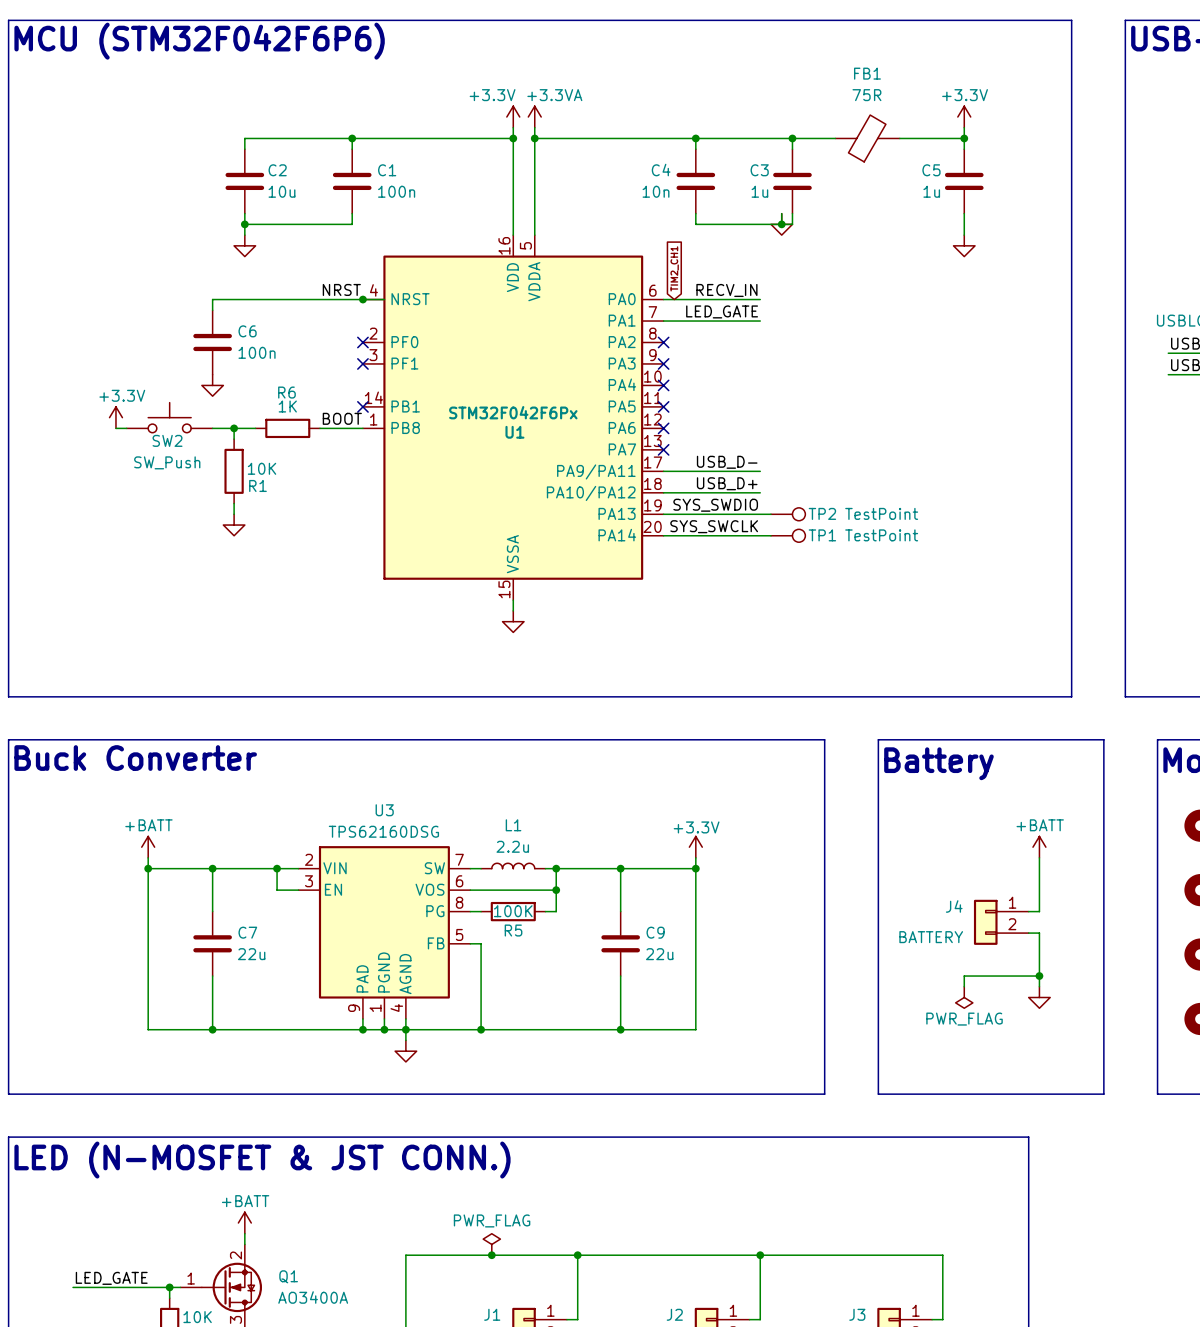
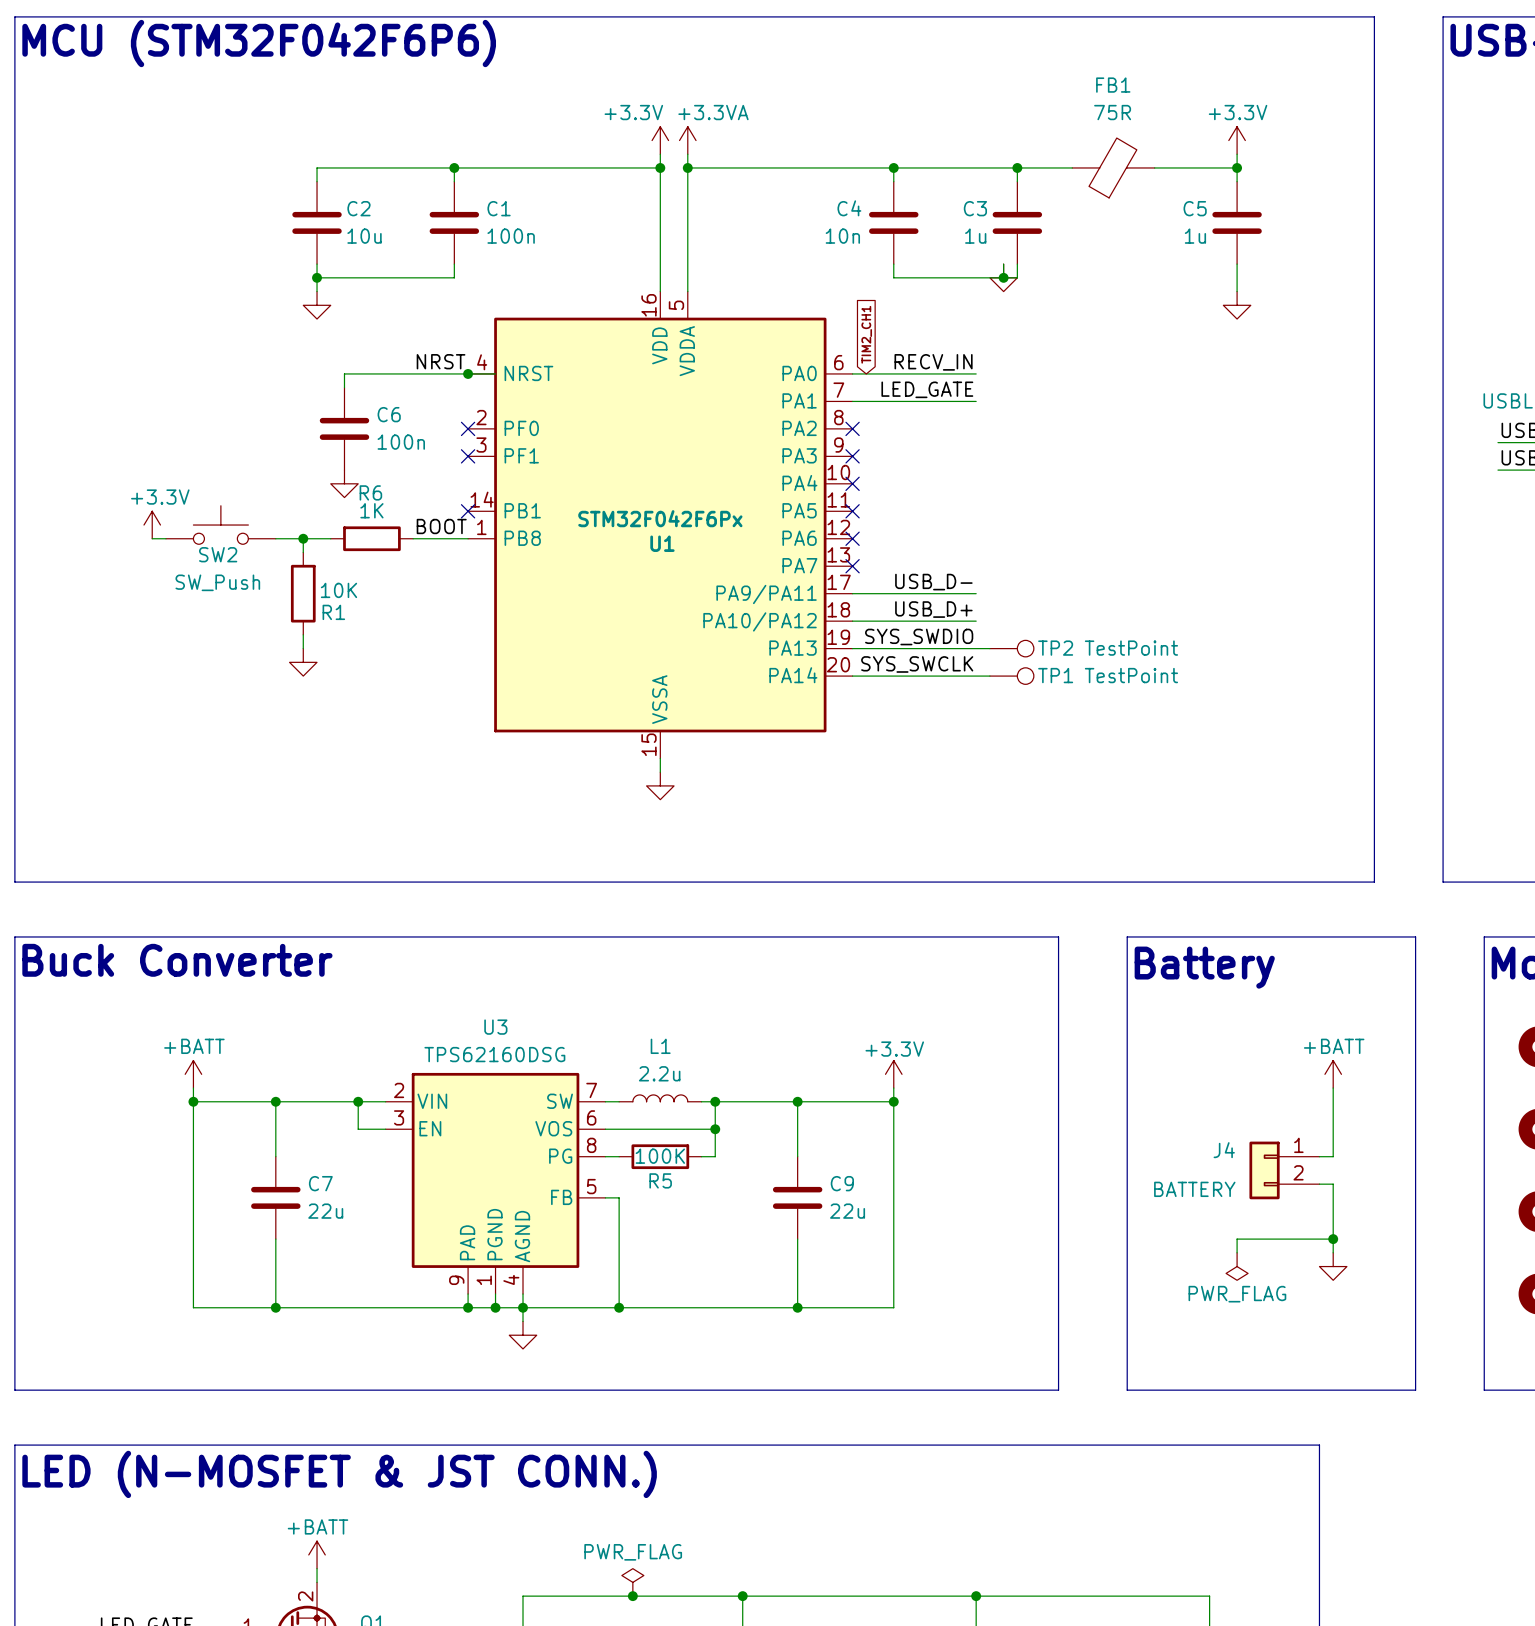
wire: (266, 299) (212, 299) (212, 310) -> (344, 373) (344, 387)
C6 position: (212, 342) -> (344, 428)
power symbol position: (212, 385) -> (344, 483)

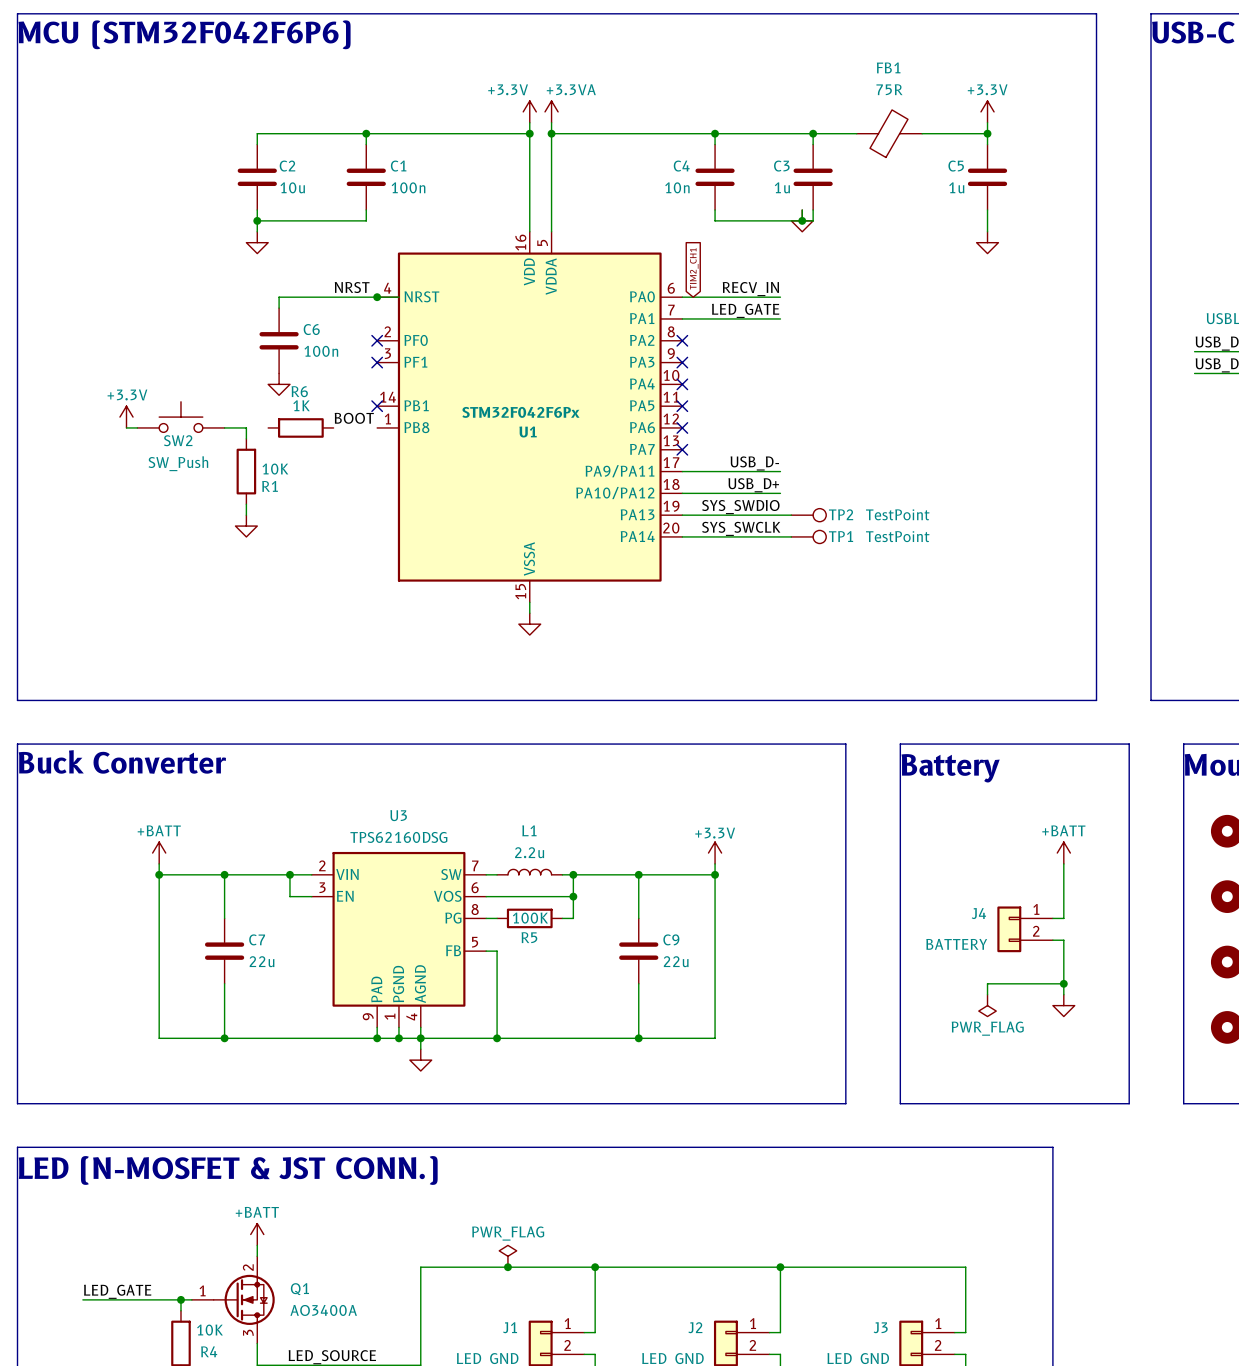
wire: (303, 538) (330, 538) -> none
junction: (303, 538) -> none
wire: (413, 538) (468, 538) -> none

